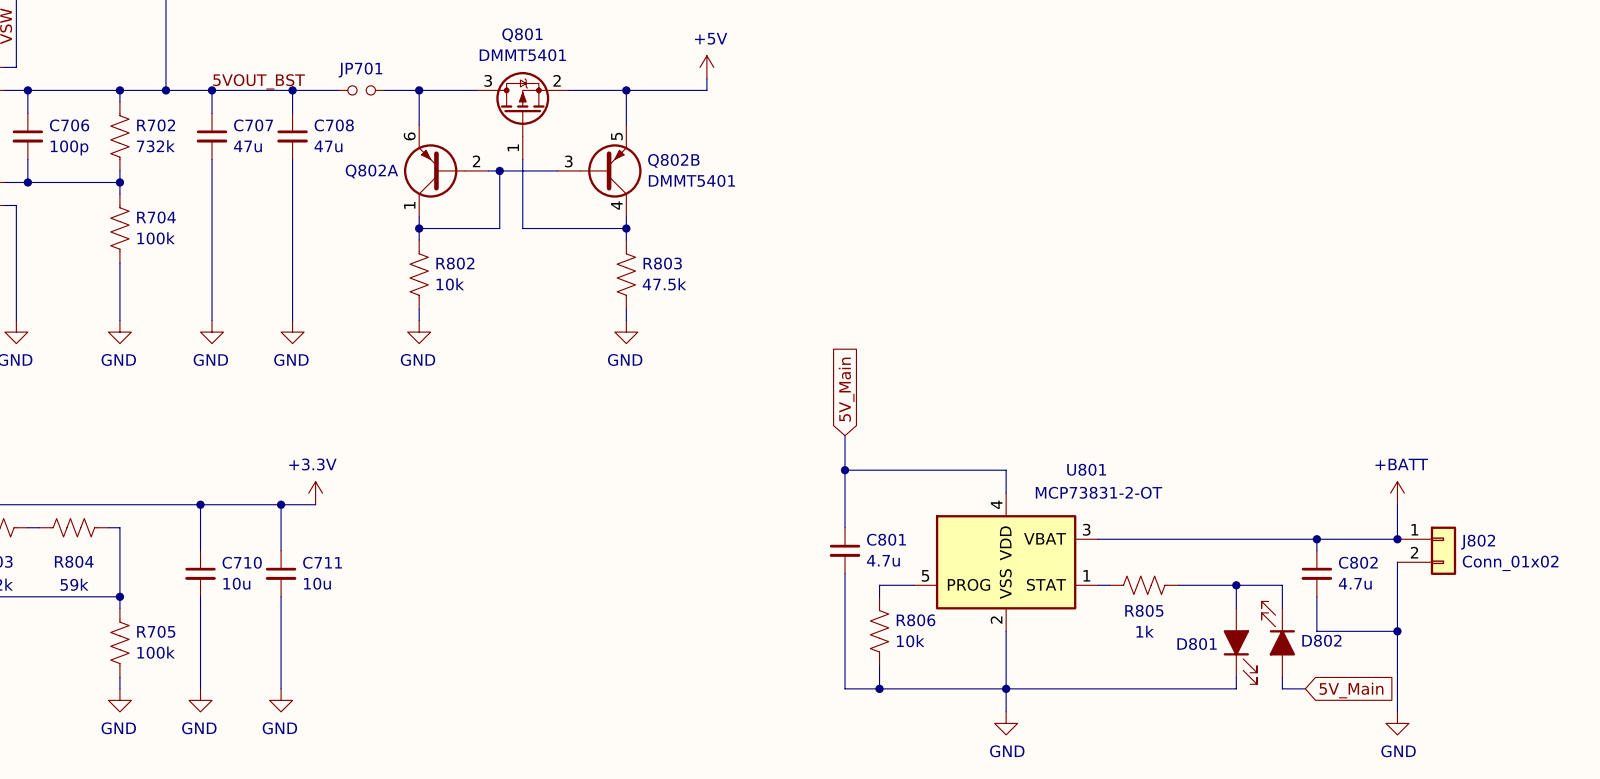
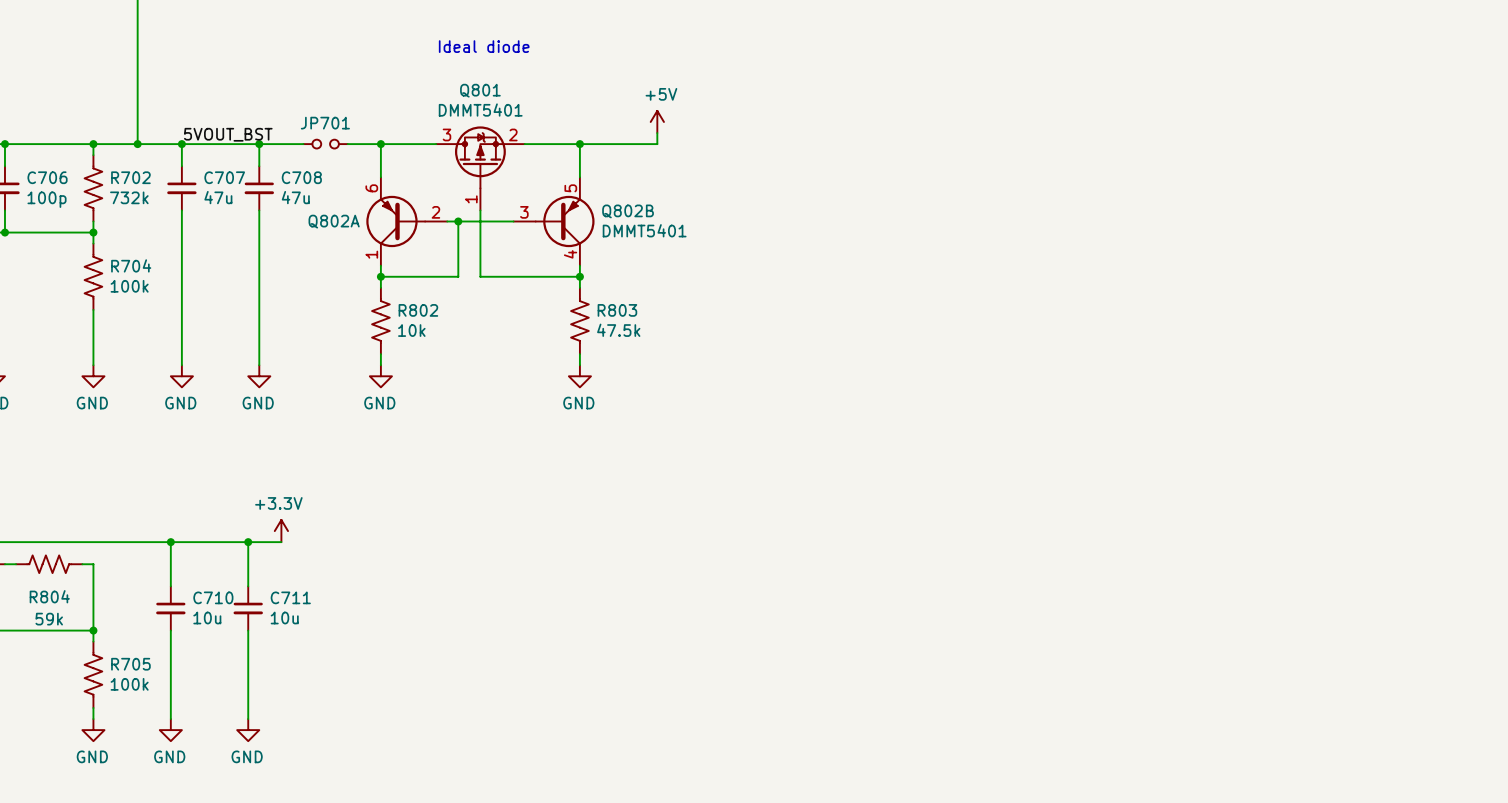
global label: 5V_Main (846, 389) -> none
wire: (845, 435) (845, 527) -> none
wire: (845, 470) (1006, 470) (1006, 493) -> none
junction: (845, 470) -> none
power symbol: +BATT (1397, 493) -> none
wire: (1397, 504) (1397, 539) (1098, 539) -> none
wire: (1316, 539) (1316, 550) -> none
junction: (1316, 539) -> none
junction: (1397, 539) -> none
C801: 4.7u (845, 550) -> none
J802: Conn_01x02 (1426, 550) -> none
U801: MCP73831-2-OT (1006, 562) -> none
wire: (1397, 562) (1397, 711) -> none
wire: (845, 573) (845, 688) (1236, 688) (1236, 677) -> none
C802: 4.7u (1316, 573) -> none
wire: (914, 585) (879, 585) (879, 596) -> none
wire: (1098, 585) (1109, 585) -> none
R805: 1k (1144, 585) -> none
wire: (1178, 585) (1282, 585) (1282, 608) -> none
wire: (1236, 585) (1236, 608) -> none
junction: (1236, 585) -> none
wire: (1316, 596) (1316, 631) (1397, 631) -> none
R806: 10k (879, 631) -> none
wire: (1006, 631) (1006, 711) -> none
junction: (1397, 631) -> none
D802: (1278, 639) -> none
D801: (1240, 646) -> none
wire: (879, 665) (879, 688) -> none
wire: (1282, 677) (1282, 688) (1305, 688) -> none
junction: (879, 688) -> none
junction: (1006, 688) -> none
global label: 5V_Main (1351, 690) -> none
power symbol: GND (1006, 723) -> none
power symbol: GND (1397, 723) -> none

